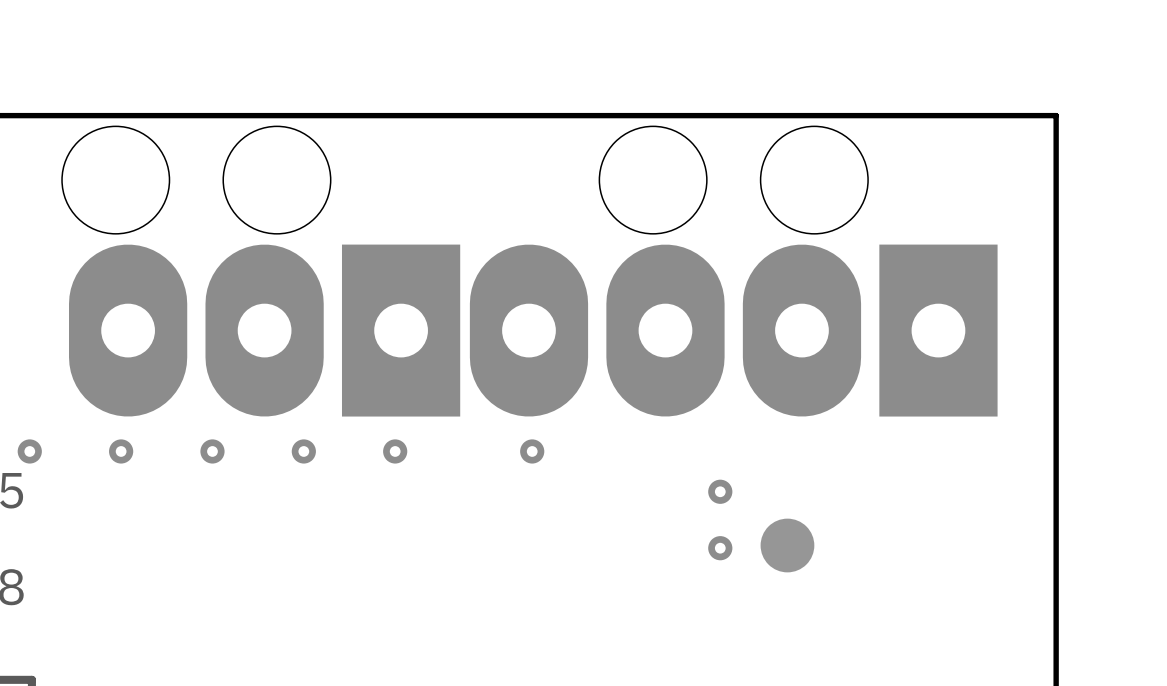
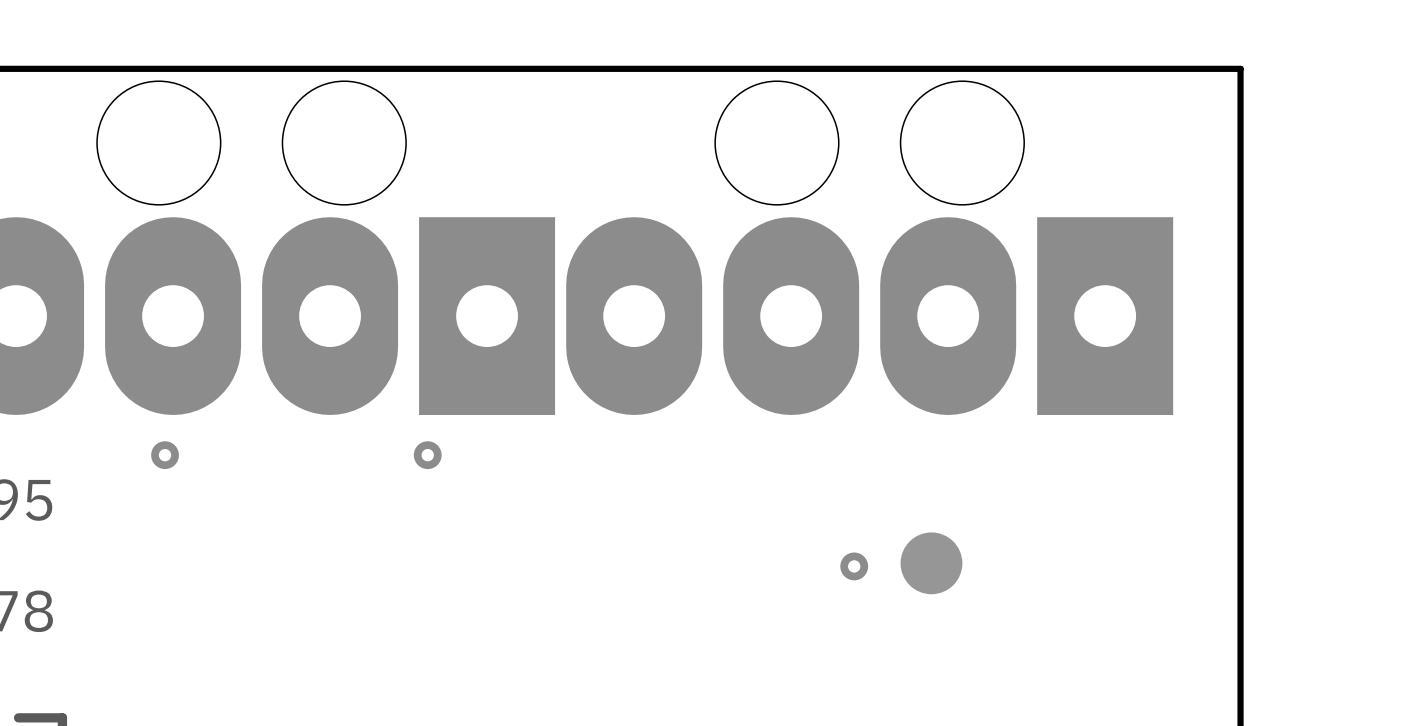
via: (29, 451) -> none
via: (212, 451) -> none
via: (303, 451) -> none
via: none -> (427, 455)
via: (395, 451) -> none
via: (532, 451) -> none
via: (720, 491) -> none

